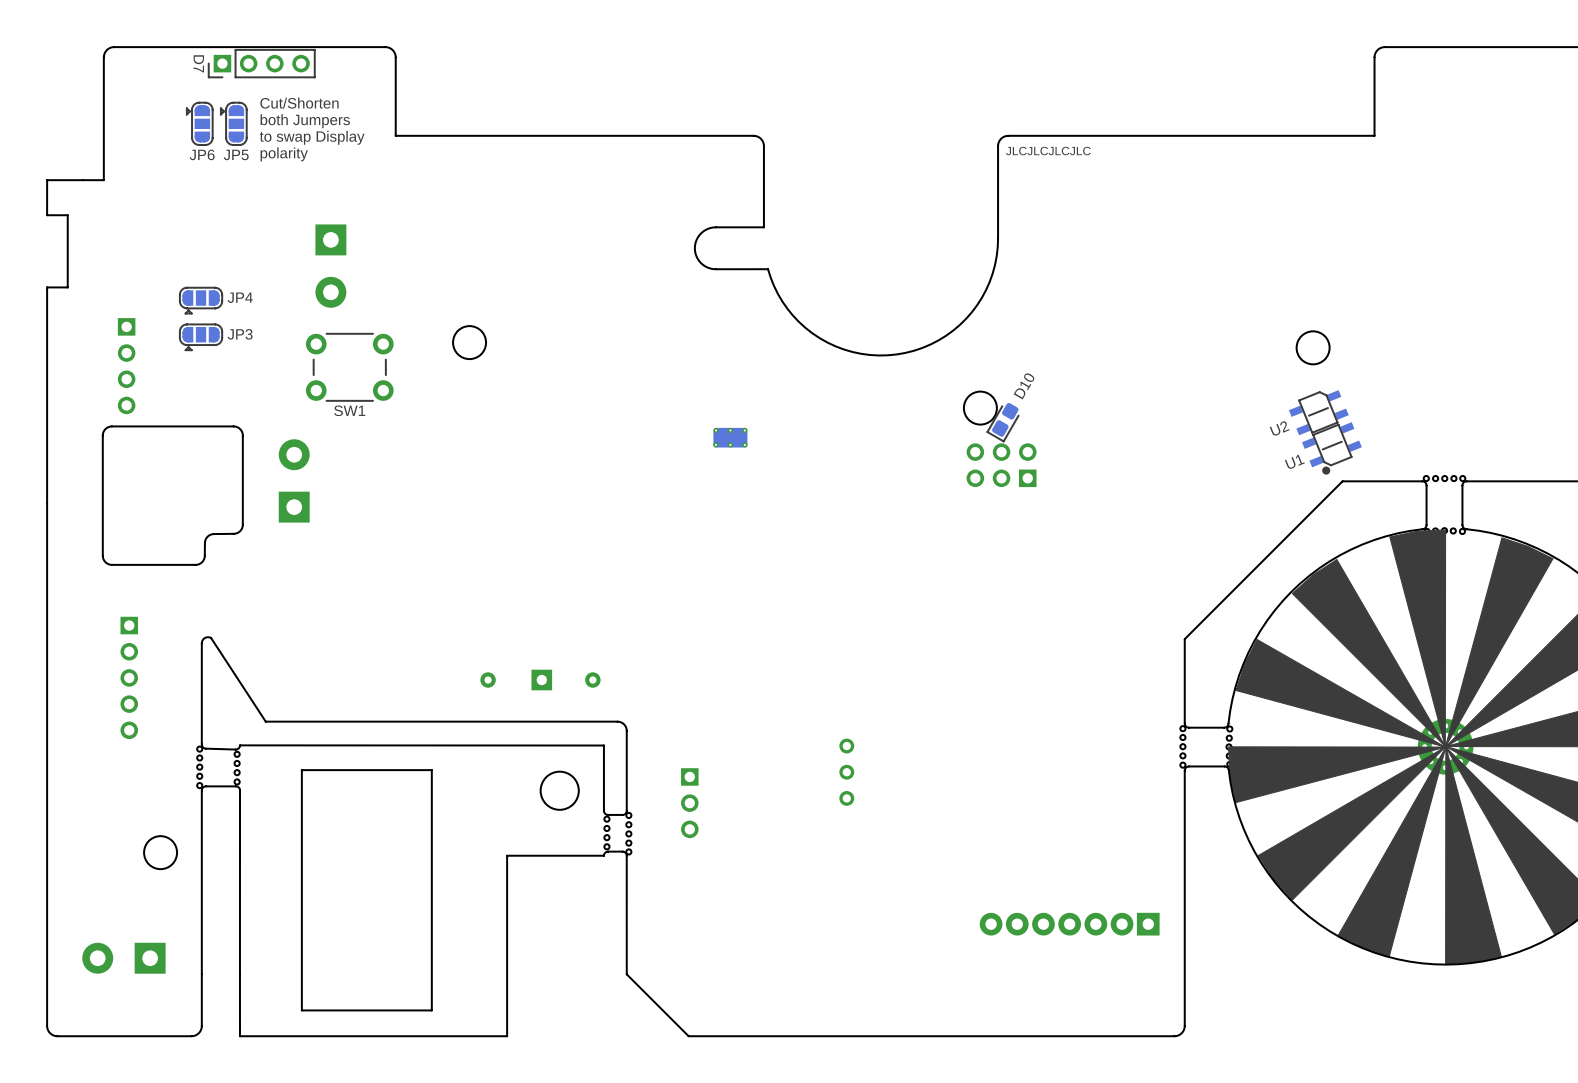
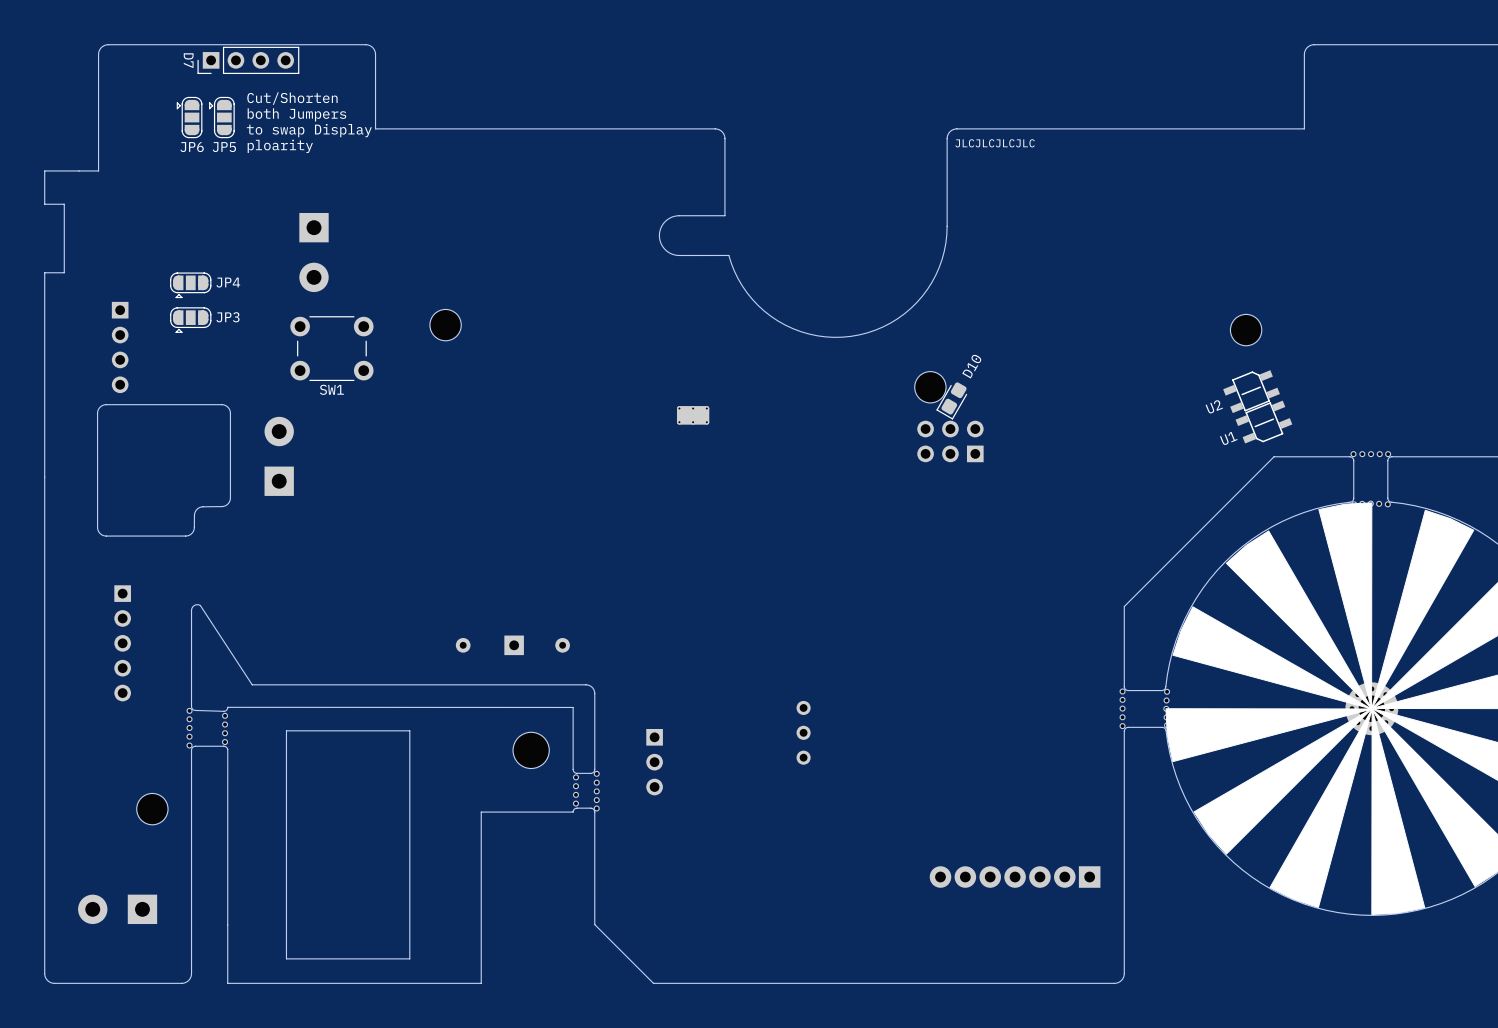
text: polarity (284, 154) -> ploarity (280, 146)
text: • (1326, 470) -> none

